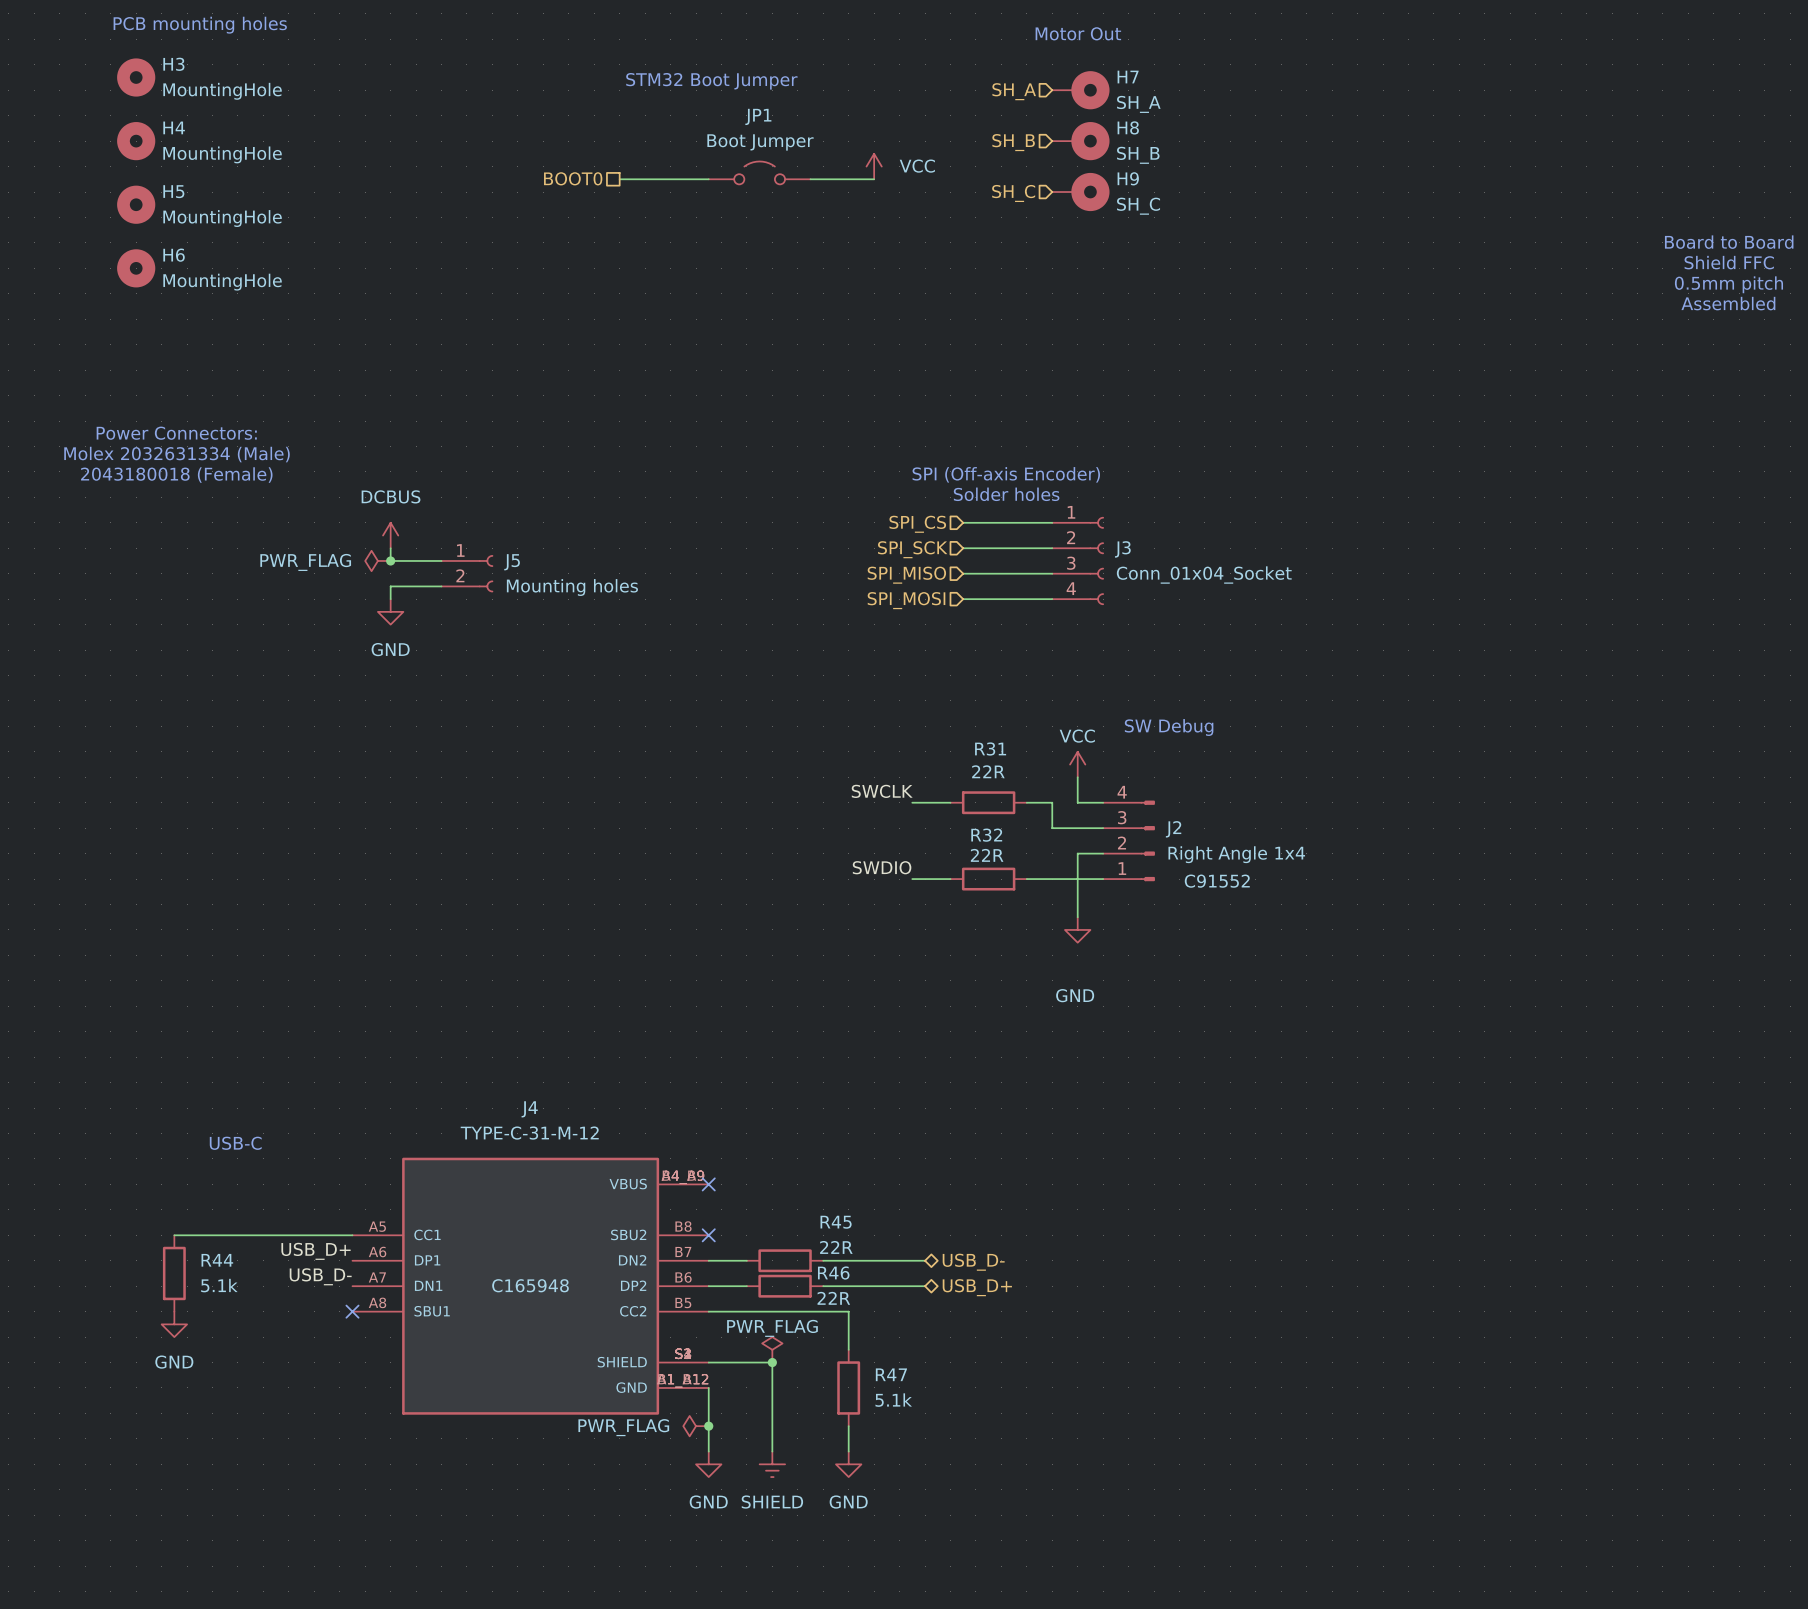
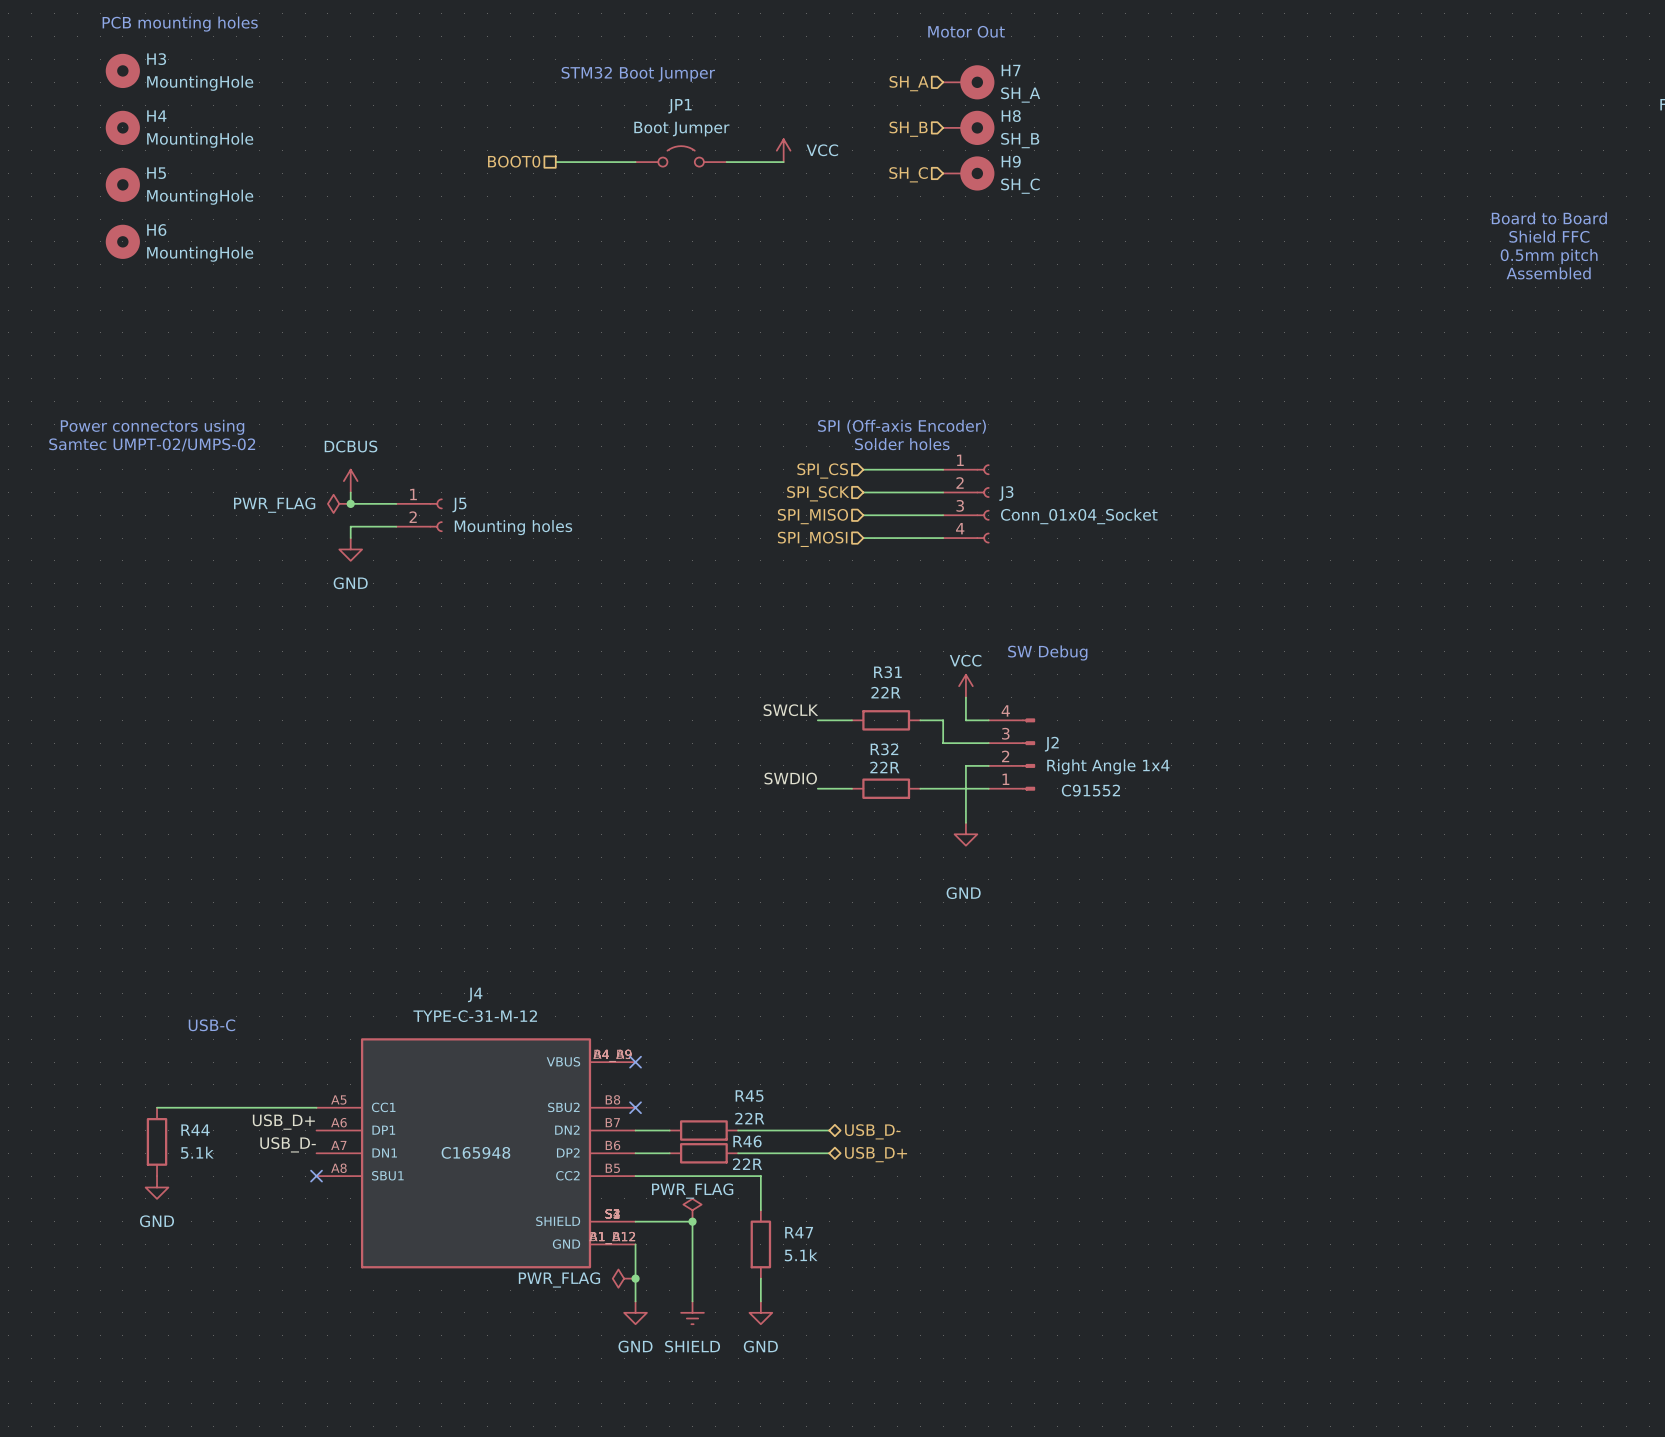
text: Power Connectors: (176, 433) -> none
text: Molex 2032631334 (Male) (177, 454) -> none
text: 2043180018 (Female) (176, 475) -> Power connectors using (152, 427)
text: none -> Samtec UMPT-02/UMPS-02 (152, 444)

